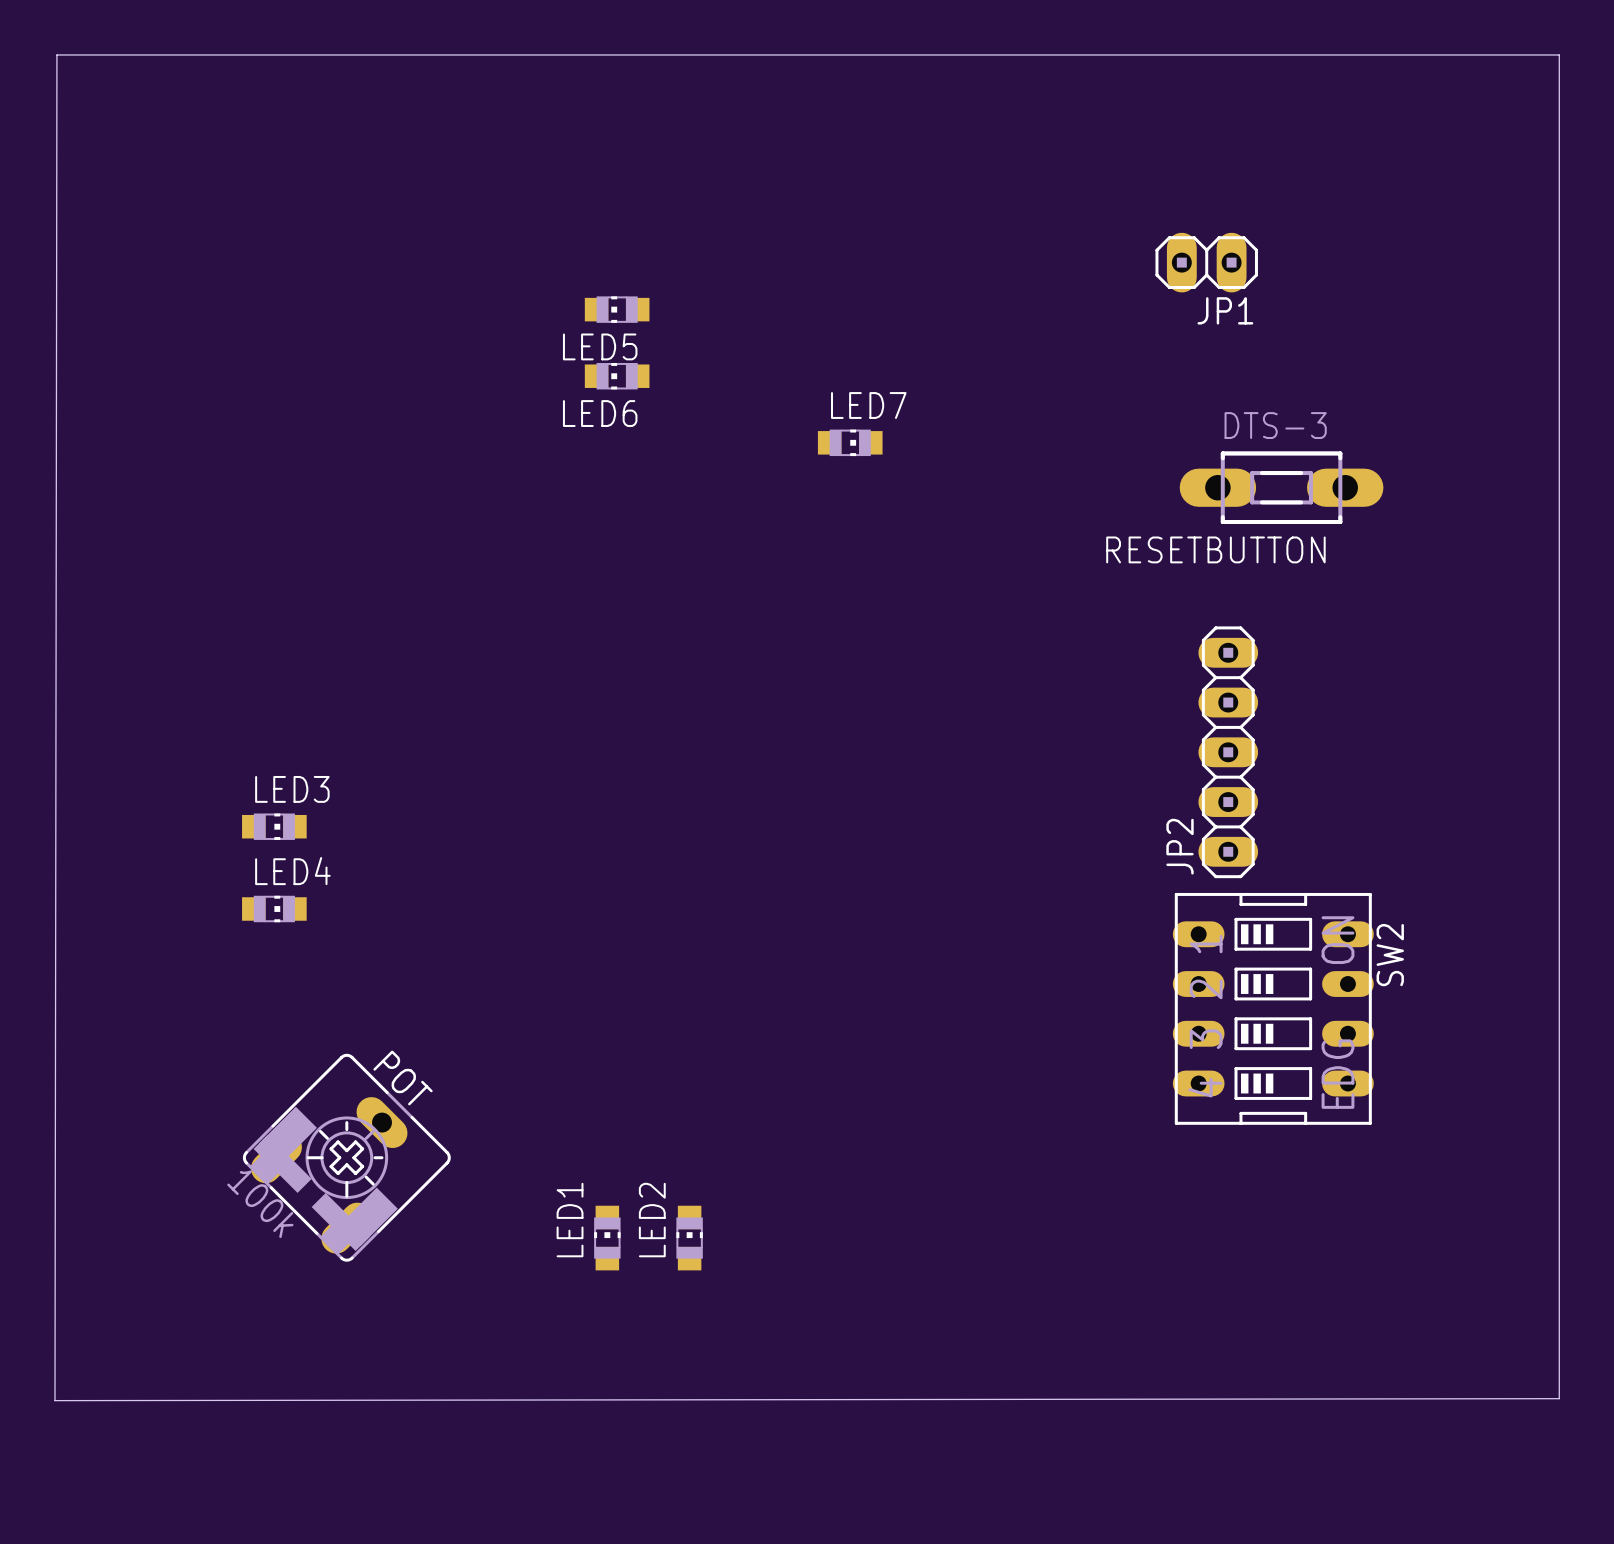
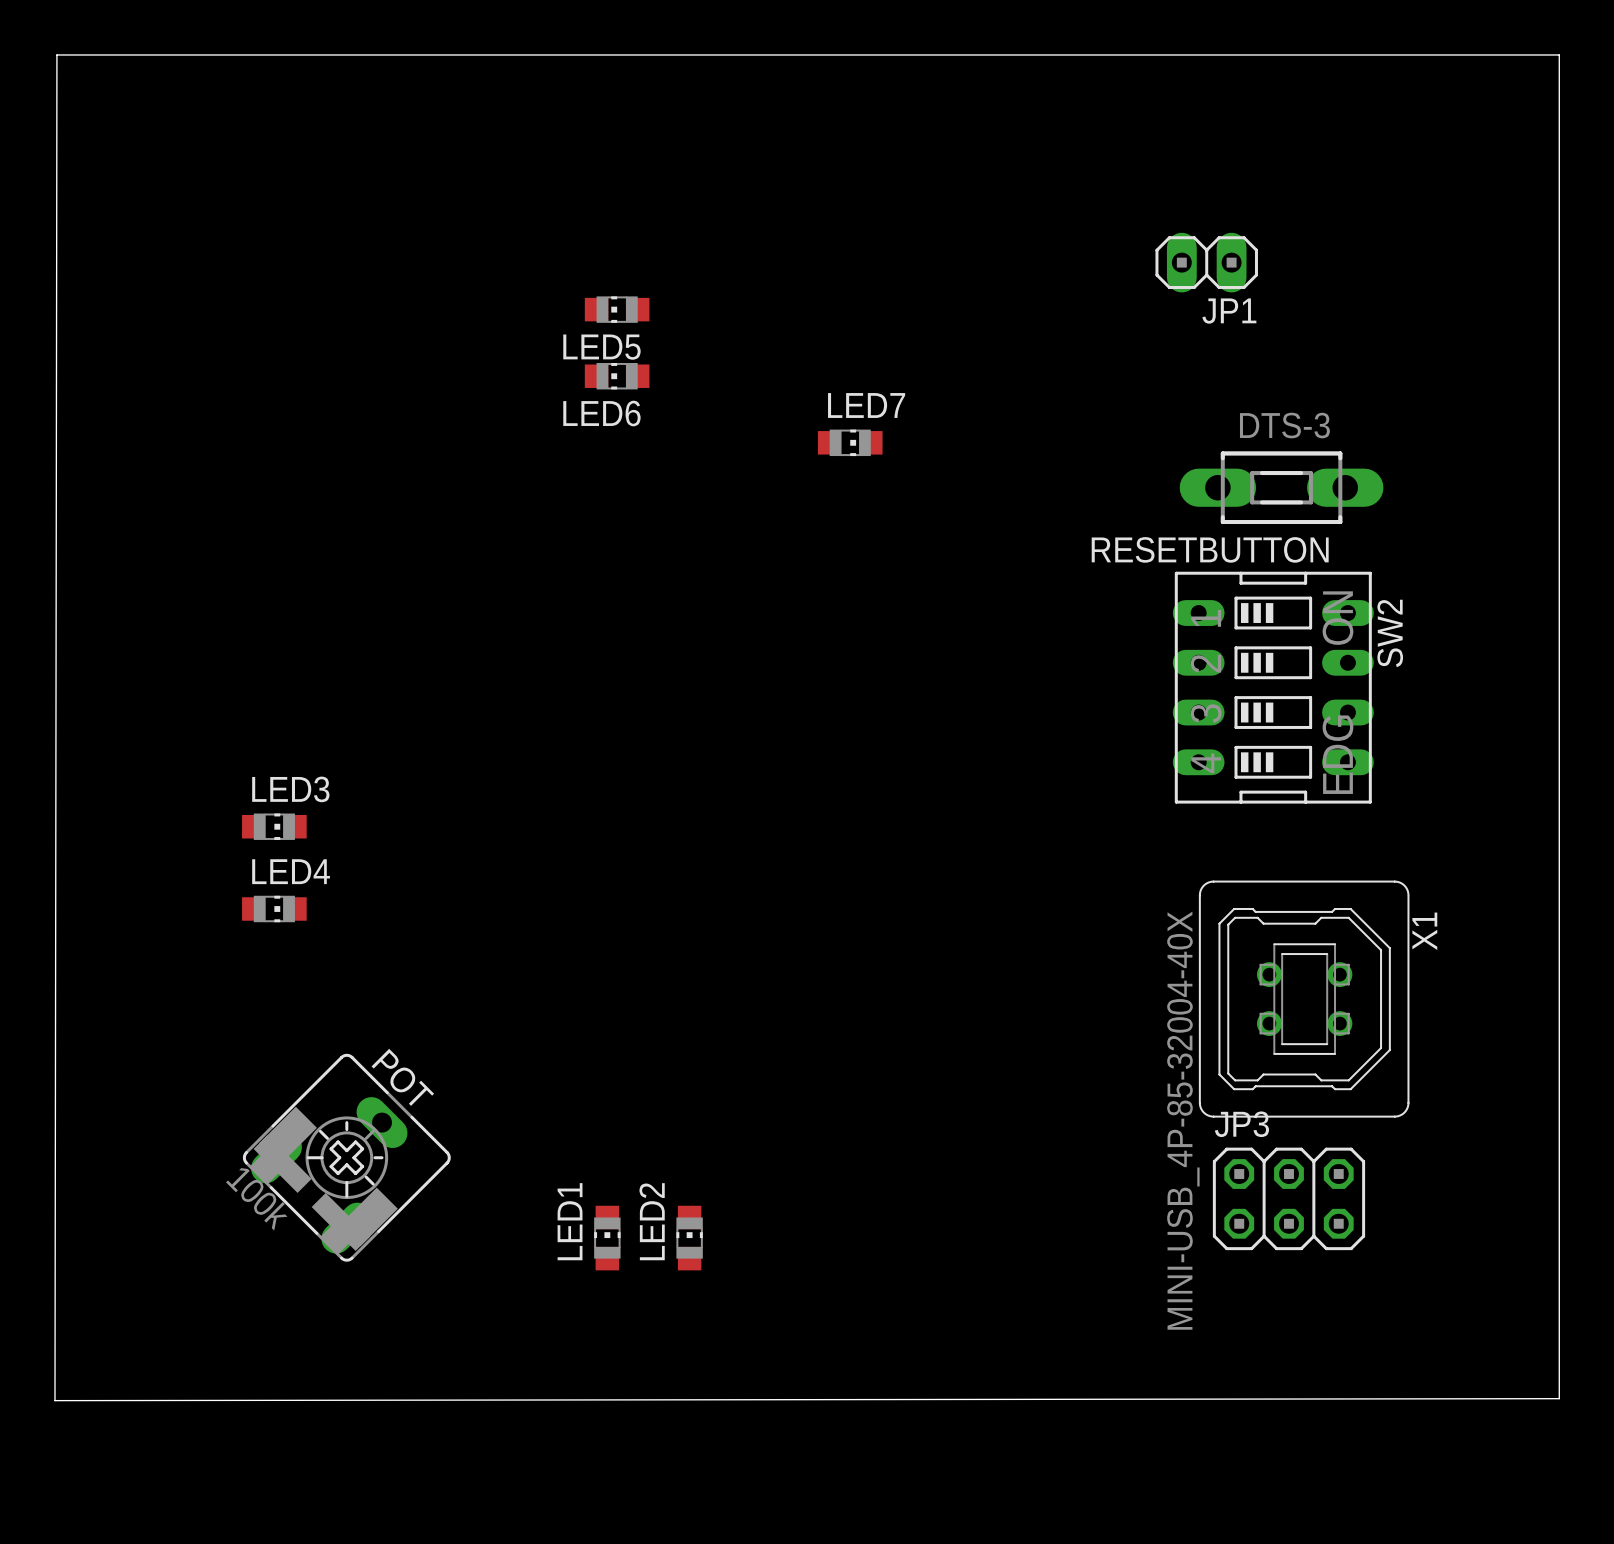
JP2: (1228, 752) -> none
X1: none -> MINI-USB_4P-85-32004-40X (1304, 999)
SW2 position: (1273, 1008) -> (1273, 687)
JP3: none -> (1288, 1198)

